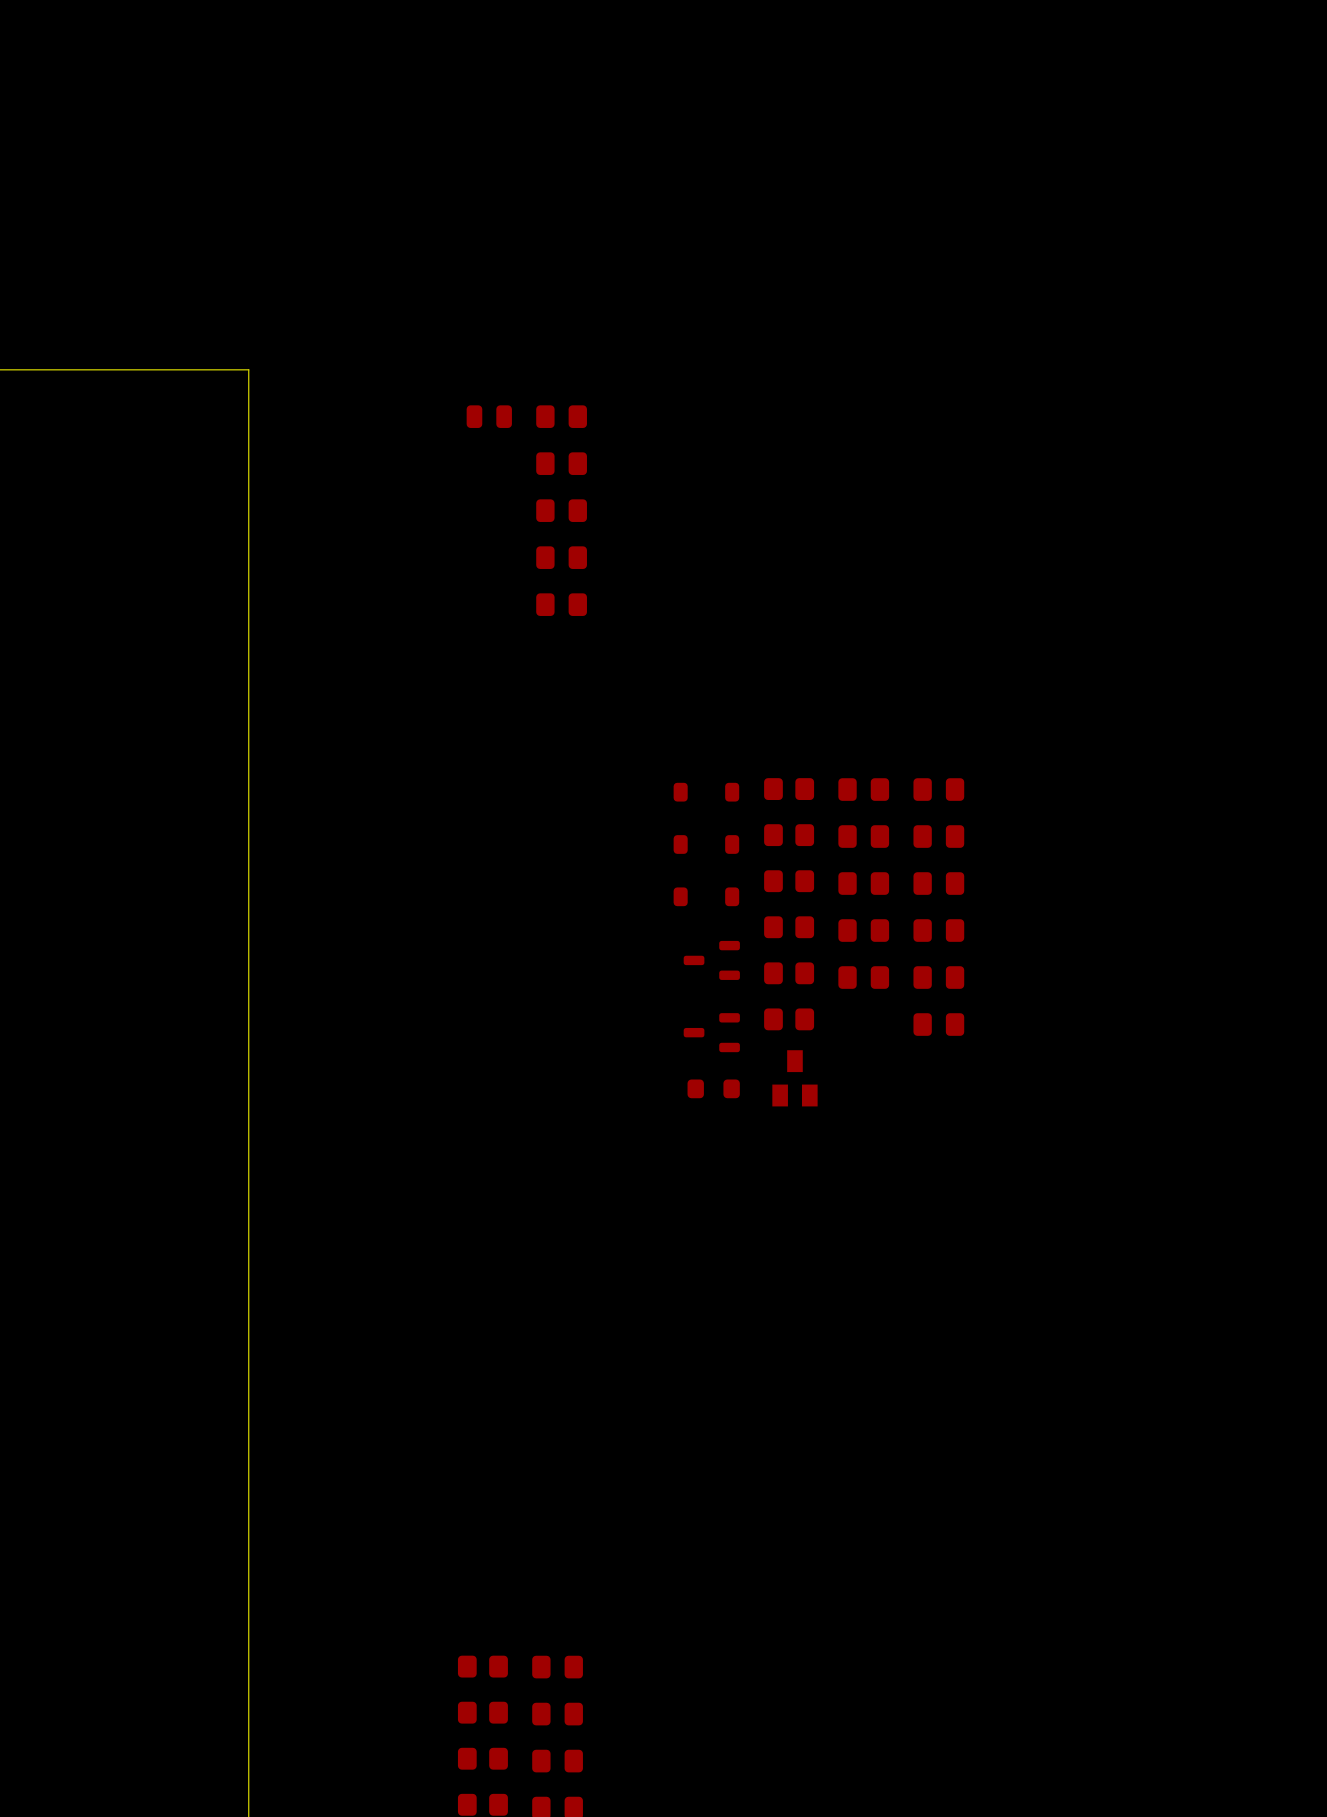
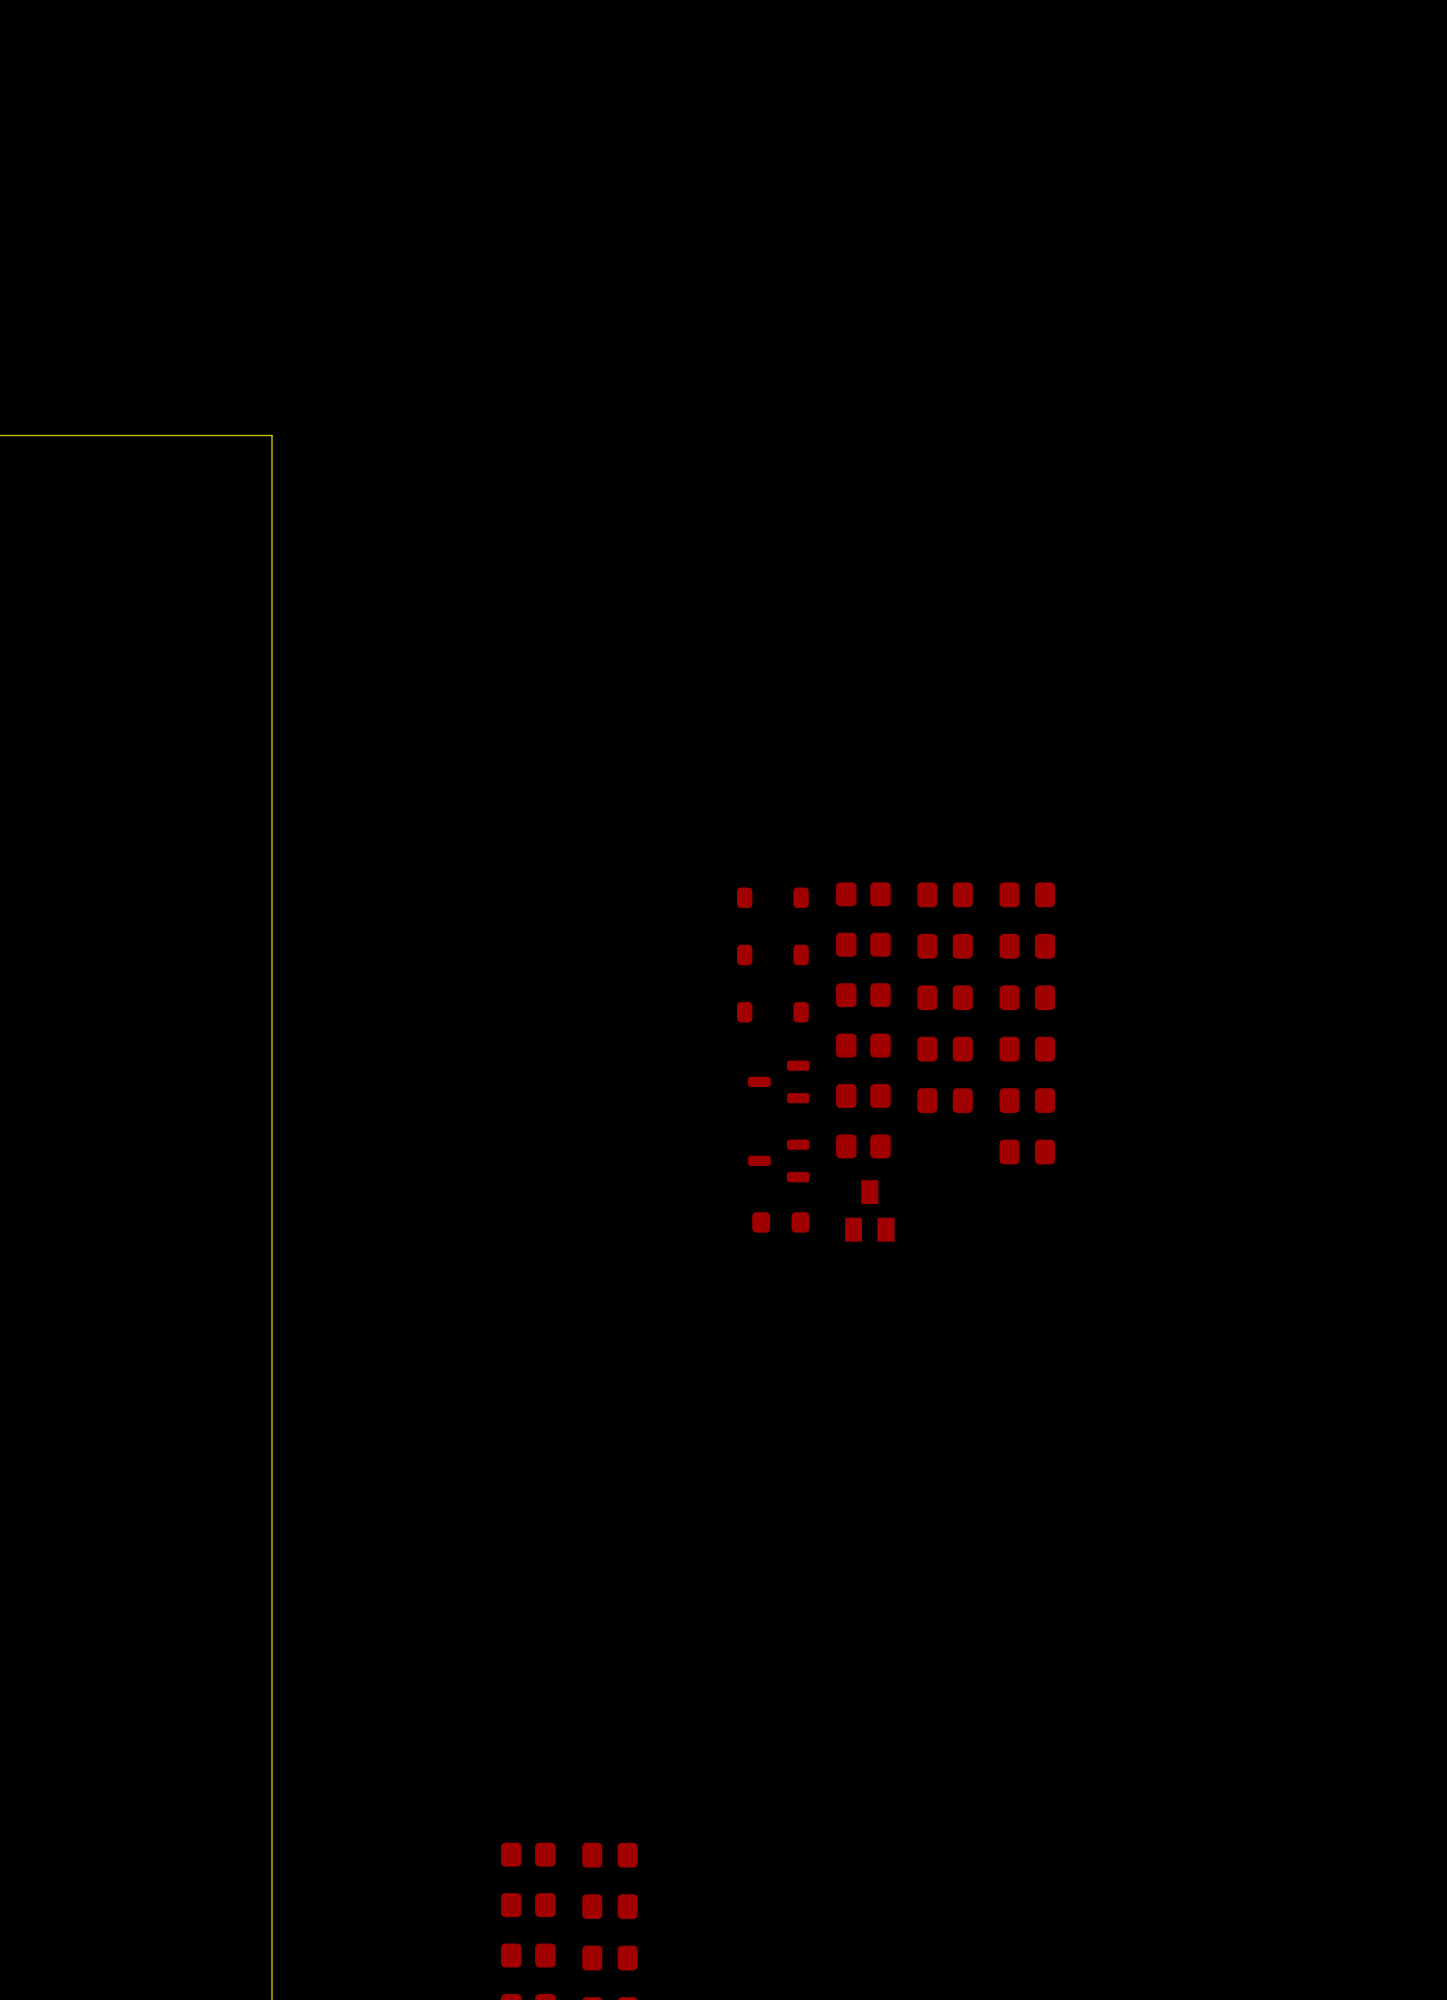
part: (489, 416) -> none
part: (561, 416) -> none
part: (561, 463) -> none
part: (561, 510) -> none
part: (561, 557) -> none
part: (561, 604) -> none

